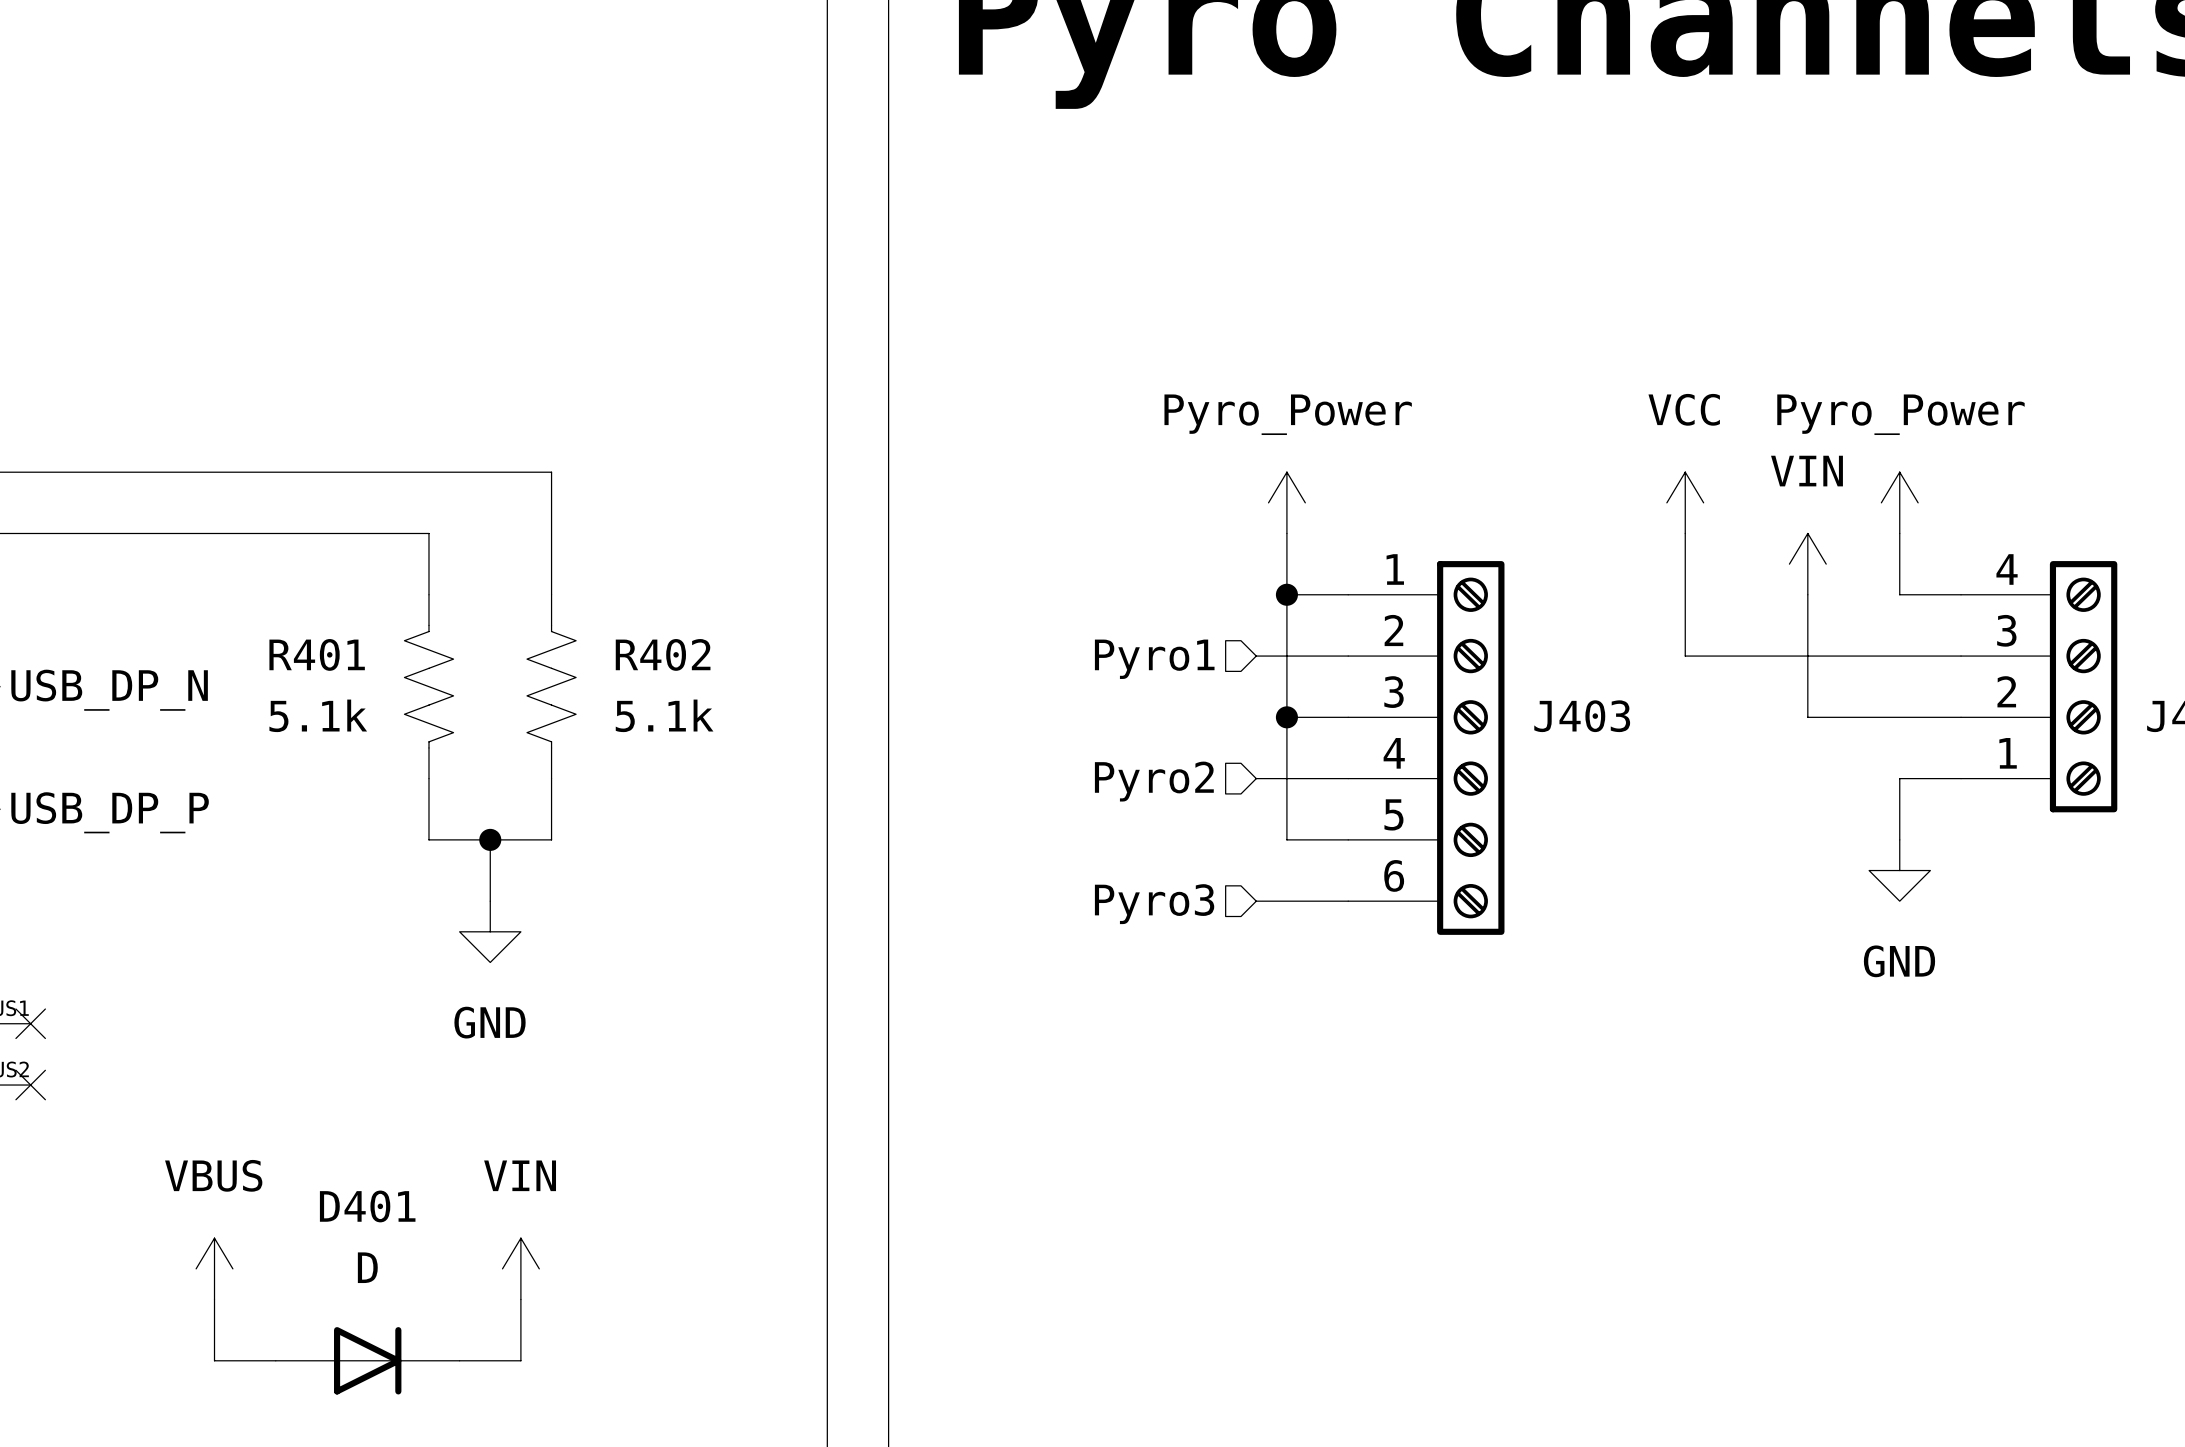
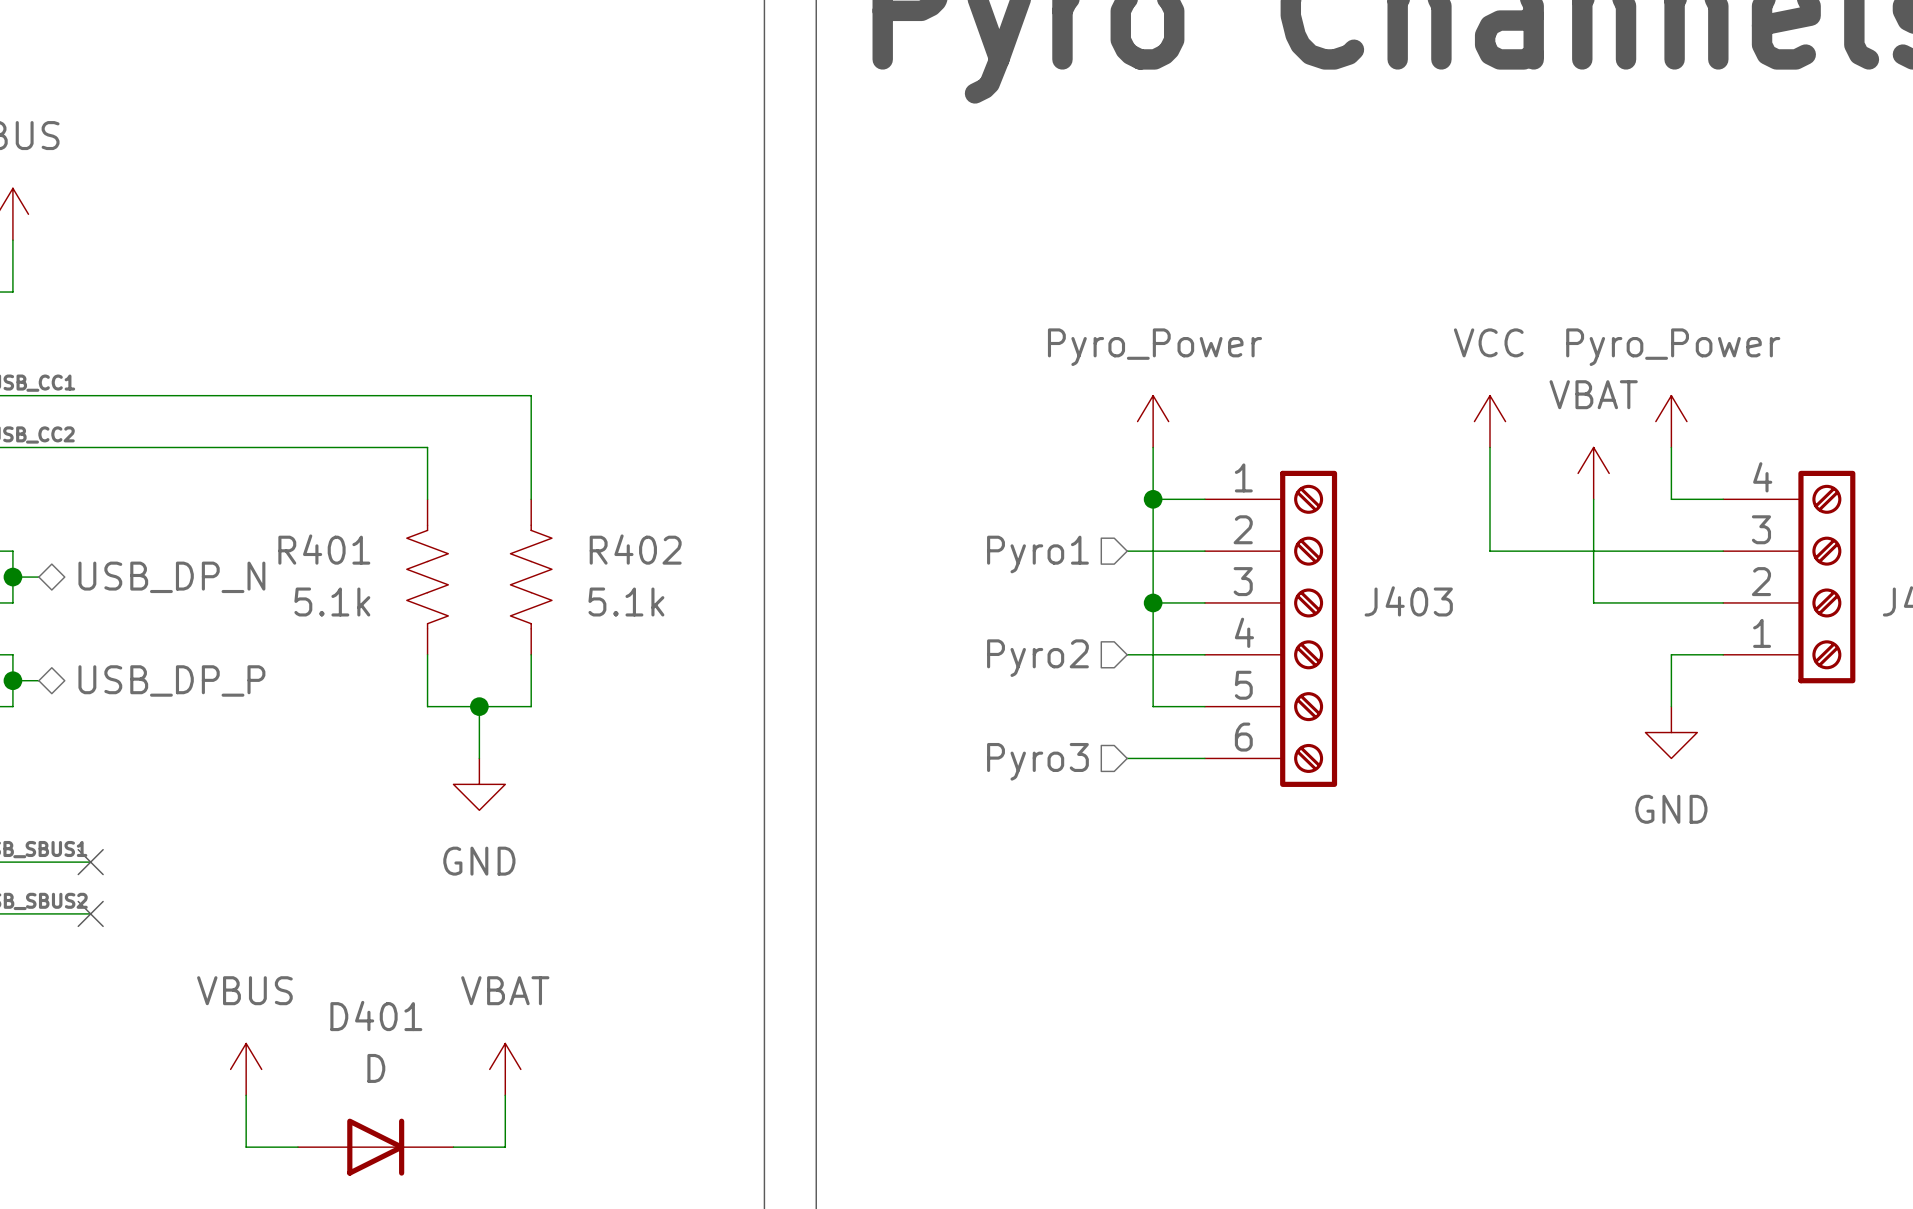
power symbol: VIN (1807, 564) -> VBAT (1593, 473)
power symbol: VIN (520, 1268) -> VBAT (505, 1069)

